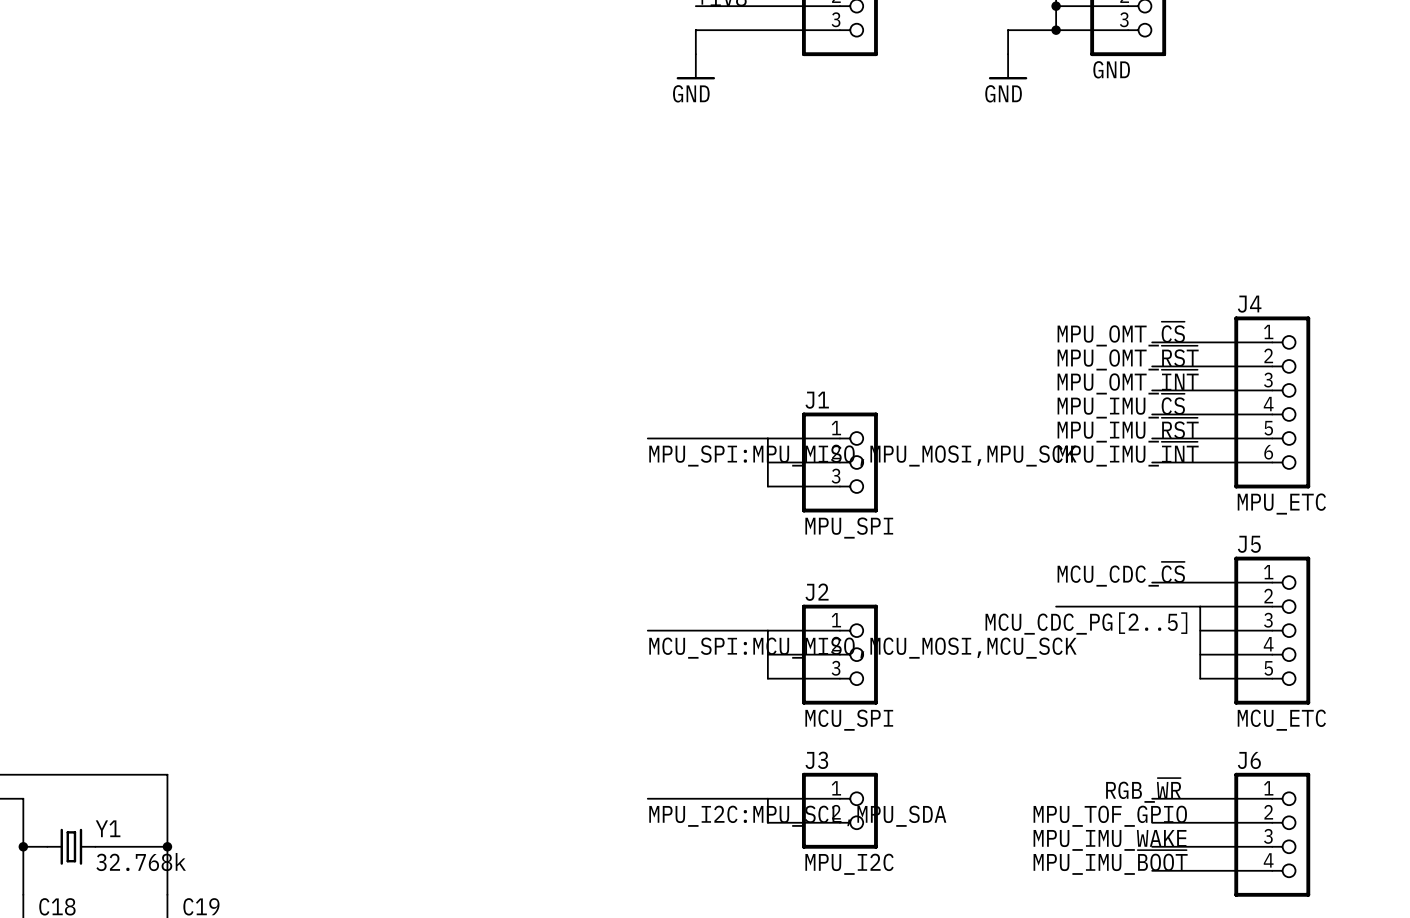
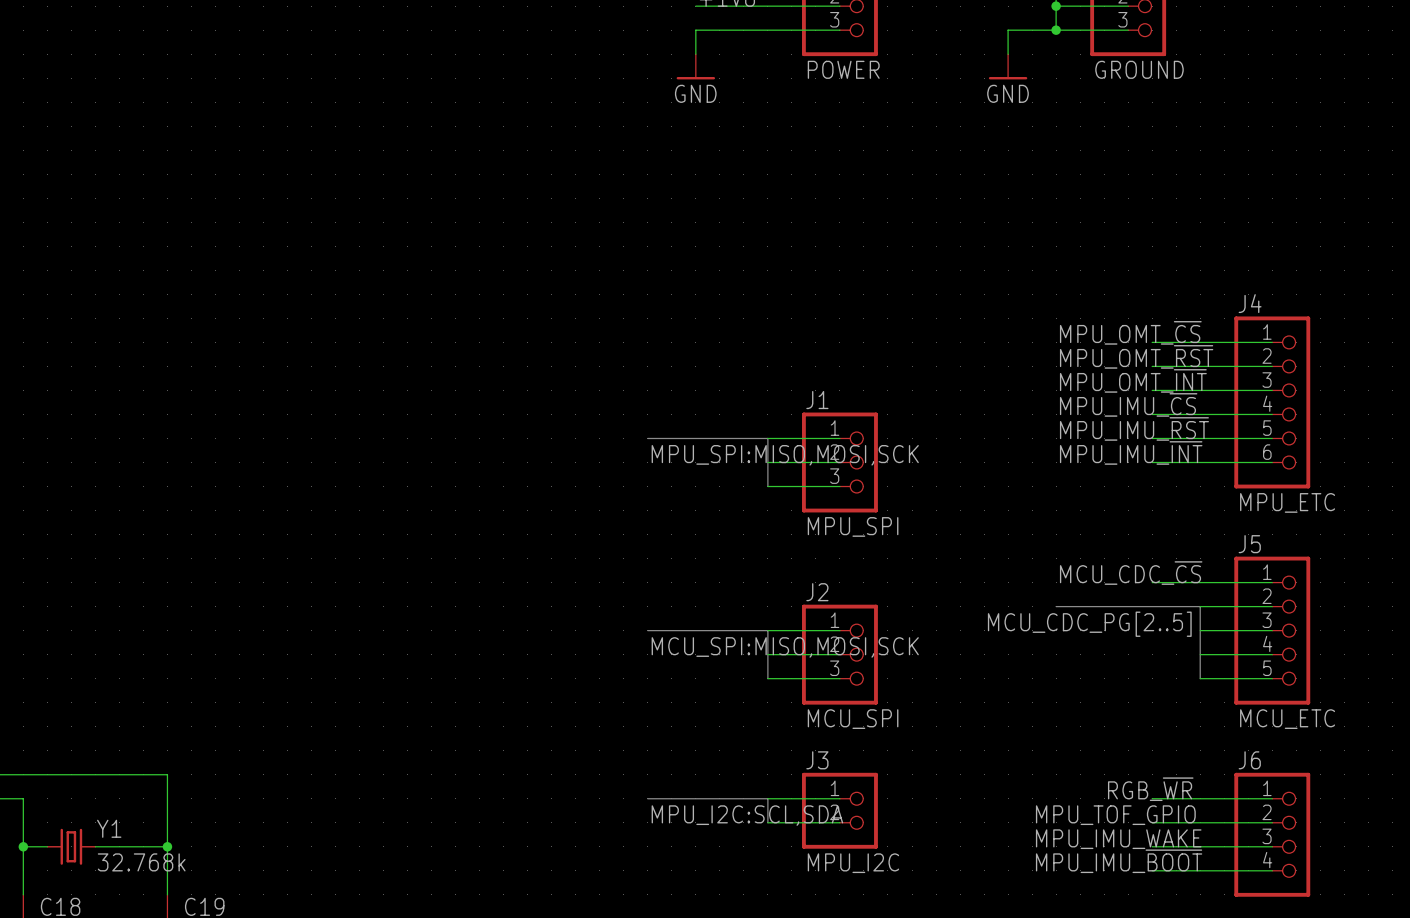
part value: none -> POWER (843, 69)
part value: GND (1111, 69) -> GROUND (1139, 69)
label: MPU_SPI:MPU_MISO,MPU_MOSI,MPU_SCK (862, 455) -> MPU_SPI:MISO,MOSI,SCK (785, 455)
label: MCU_SPI:MCU_MISO,MCU_MOSI,MCU_SCK (862, 648) -> MCU_SPI:MISO,MOSI,SCK (785, 647)
label: MPU_I2C:MPU_SCL,MPU_SDA (797, 816) -> MPU_I2C:SCL,SDA (747, 815)

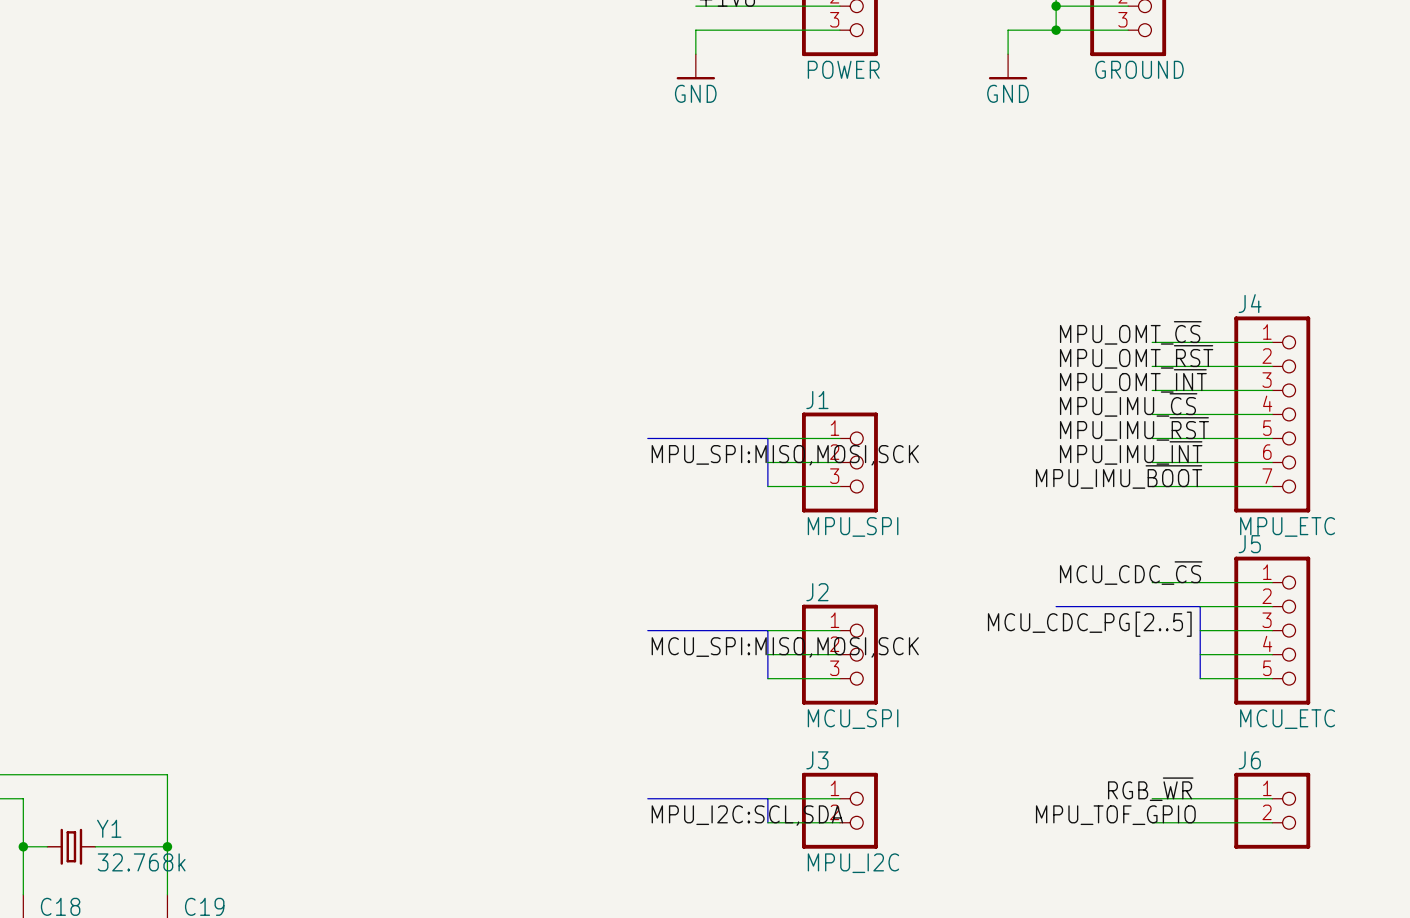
J4 symbol: [1234, 316, 1311, 489] -> [1234, 316, 1311, 513]
label: none -> MPU_IMU_~{BOOT} (1119, 476)
wire: none -> (1152, 486) (1272, 486)
J6 symbol: [1234, 772, 1311, 897] -> [1234, 772, 1311, 849]
label: MPU_IMU_WAKE (1118, 839) -> none
wire: (1152, 846) (1272, 846) -> none
label: MPU_IMU_~{BOOT} (1119, 861) -> none
wire: (1152, 870) (1272, 870) -> none

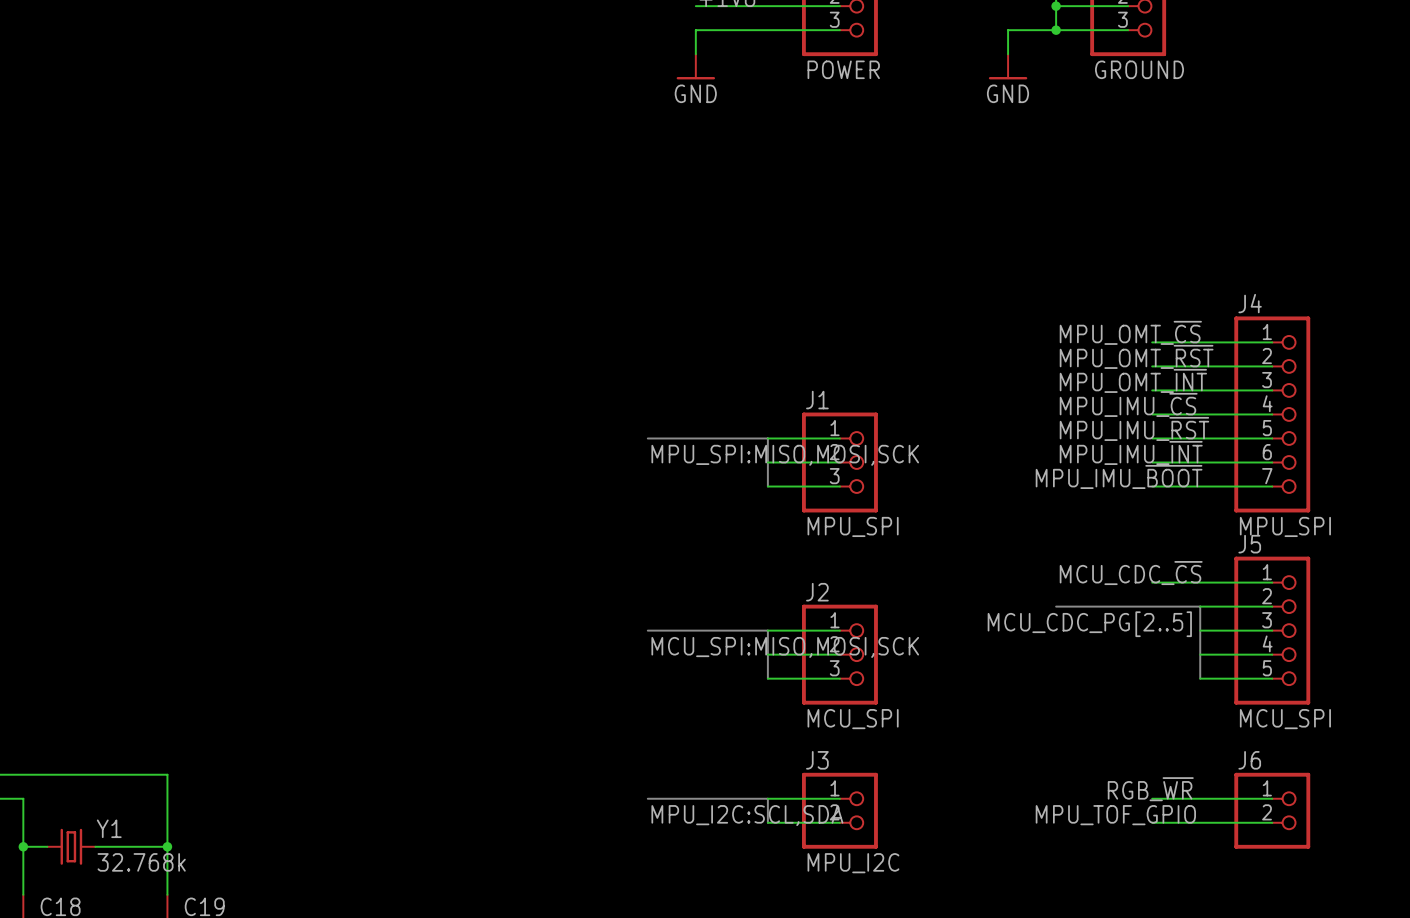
J4 value: MPU_ETC (1287, 526) -> MPU_SPI (1285, 526)
J5 value: MCU_ETC (1287, 719) -> MCU_SPI (1285, 719)

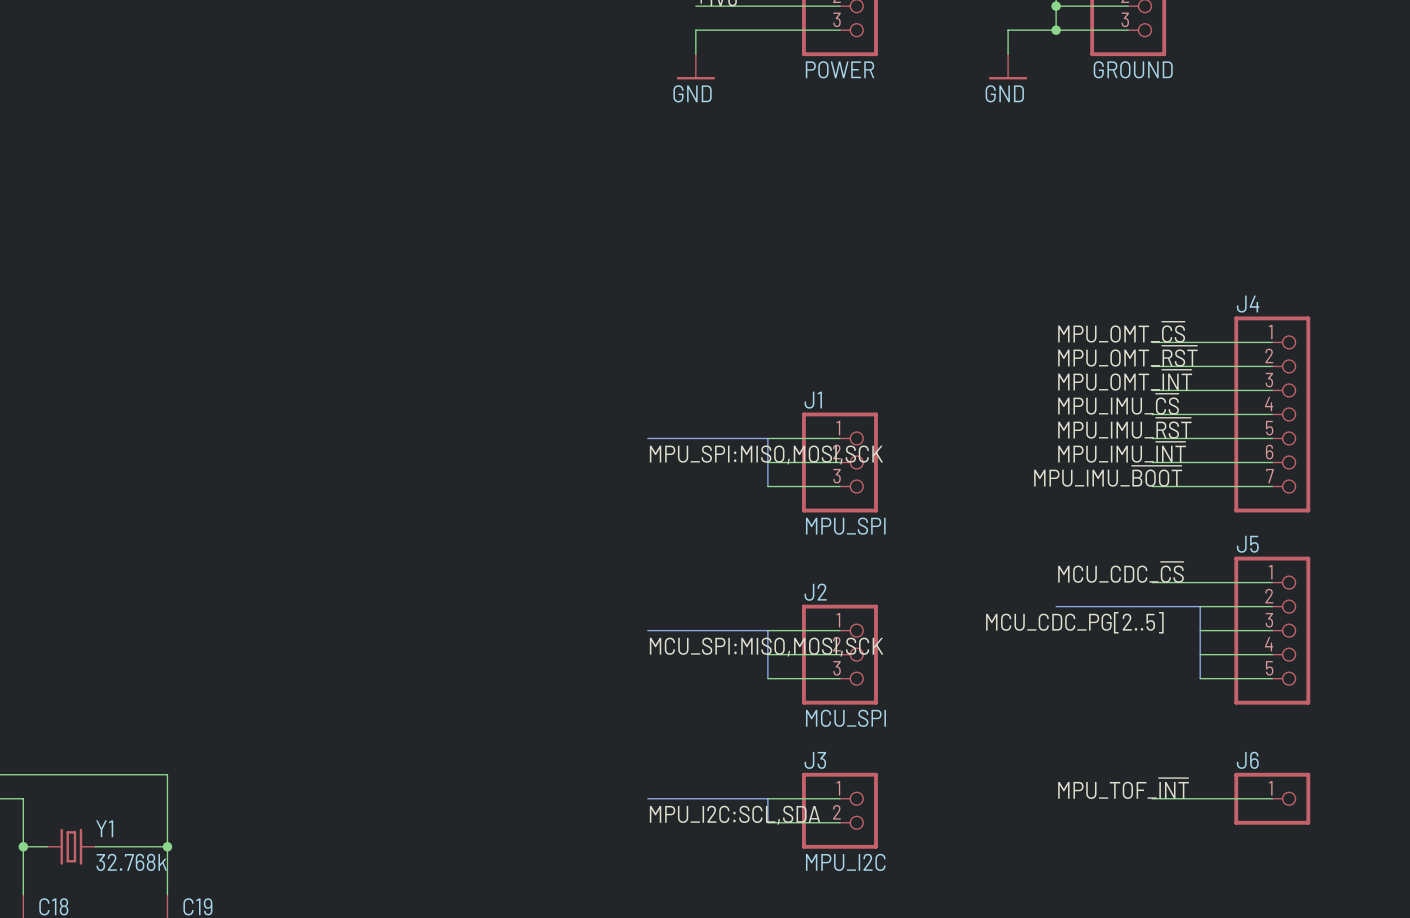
J4 value: MPU_SPI (1285, 526) -> none
J5 value: MCU_SPI (1285, 719) -> none
J6 symbol: [1234, 772, 1311, 849] -> [1234, 772, 1311, 825]
label: RGB_~{WR} (1150, 789) -> none
label: MPU_TOF_GPIO (1115, 815) -> MPU_TOF_~{INT} (1123, 788)
wire: (1152, 822) (1272, 822) -> none

